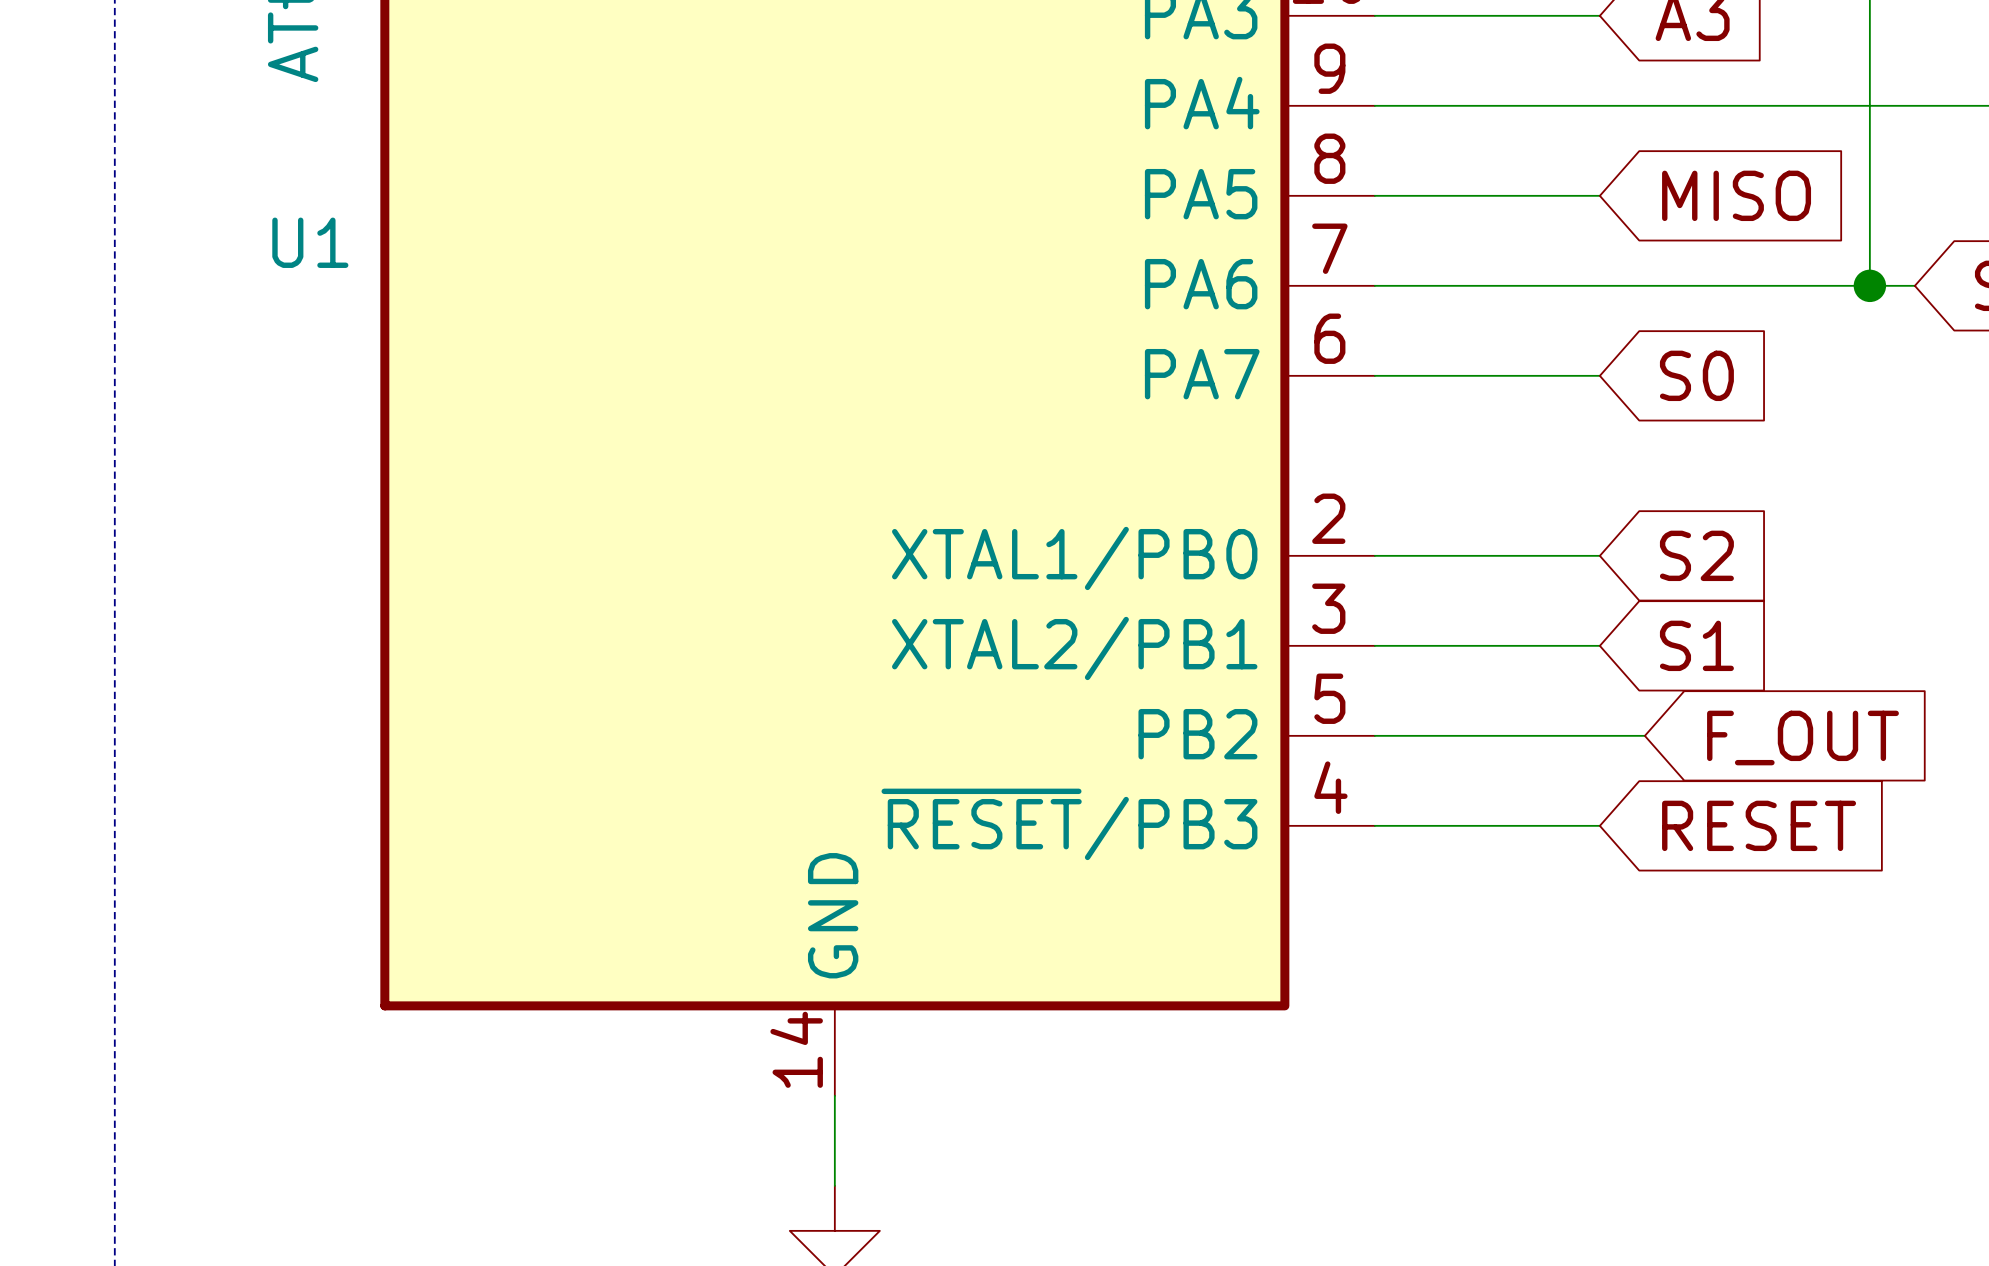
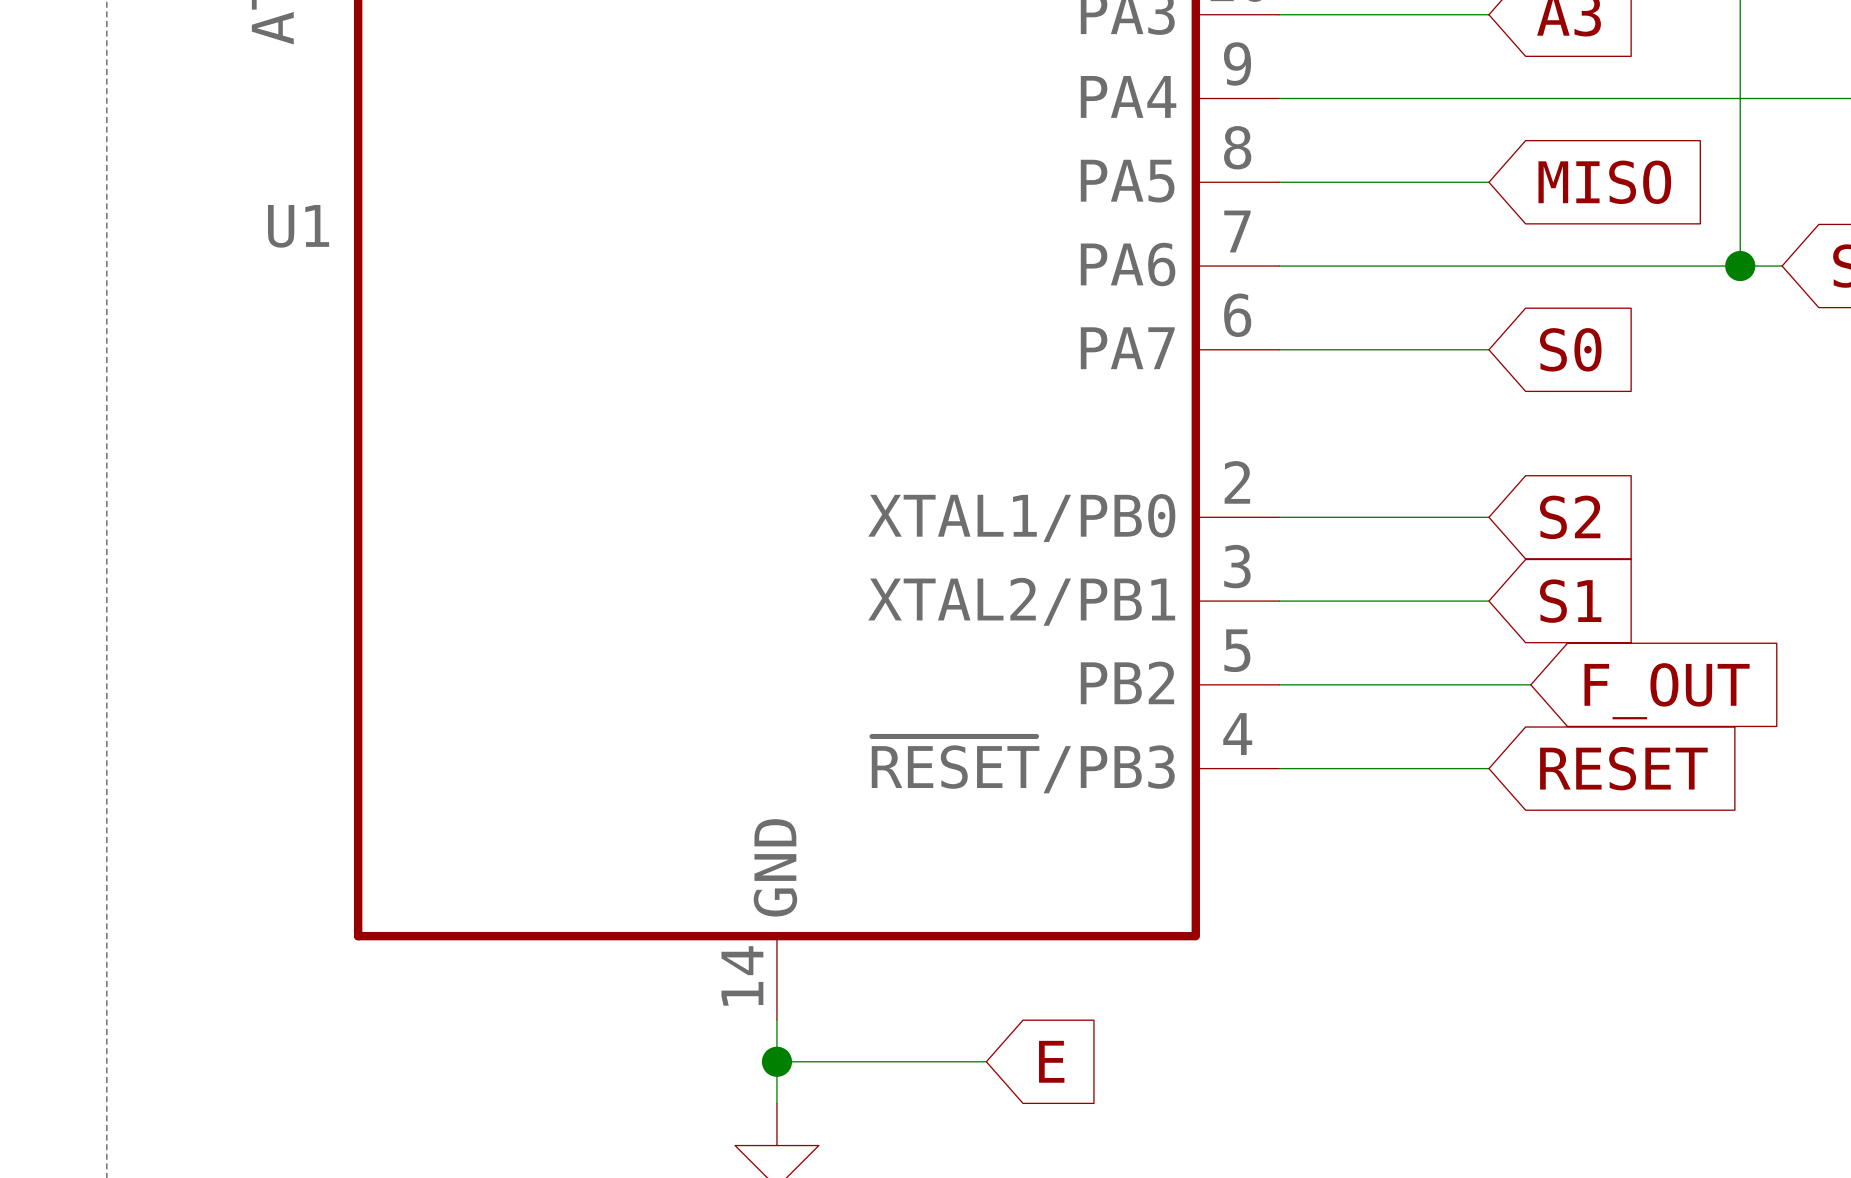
wire: none -> (776, 1061) (986, 1061)
junction: none -> (776, 1061)
global label: none -> E (1051, 1061)

